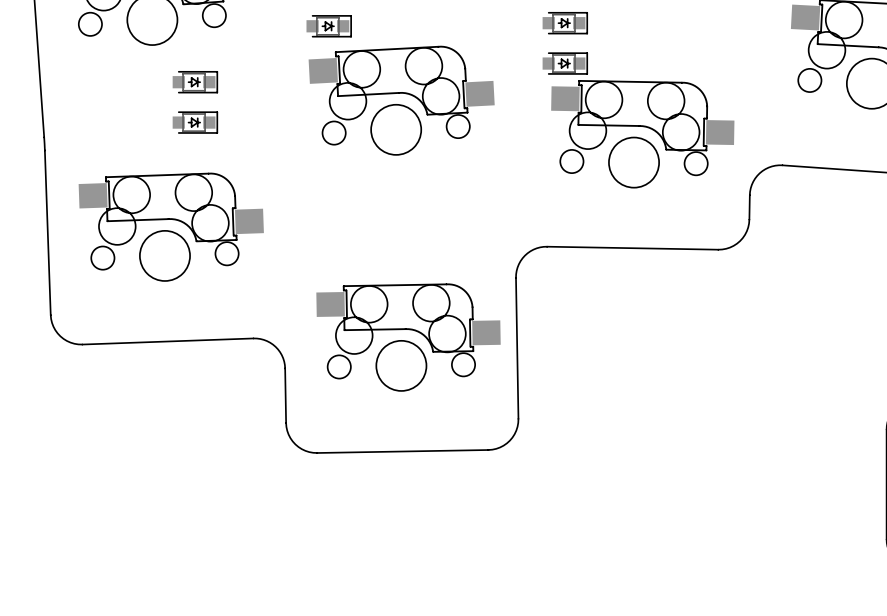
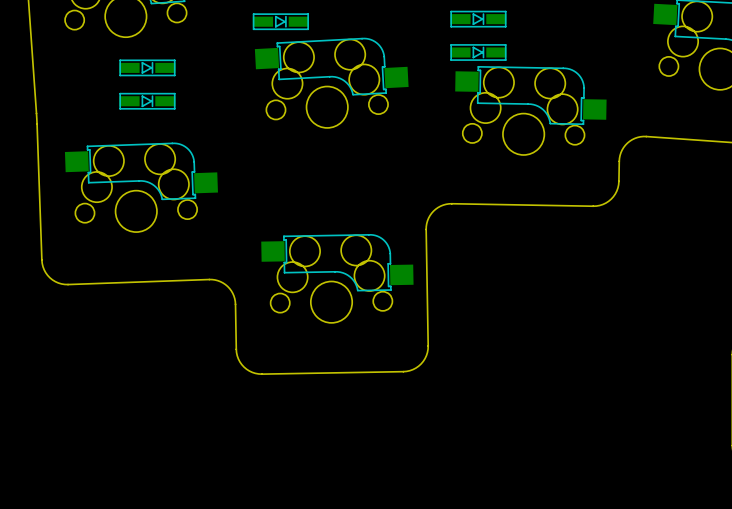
part footprint: [306, 15, 352, 38] -> [252, 13, 309, 31]
part: (565, 23) -> none
part: none -> (478, 19)
part: (565, 63) -> none
part: none -> (478, 52)
part: none -> (147, 67)
part: (195, 82) -> none
part: none -> (147, 101)
part: (195, 122) -> none

